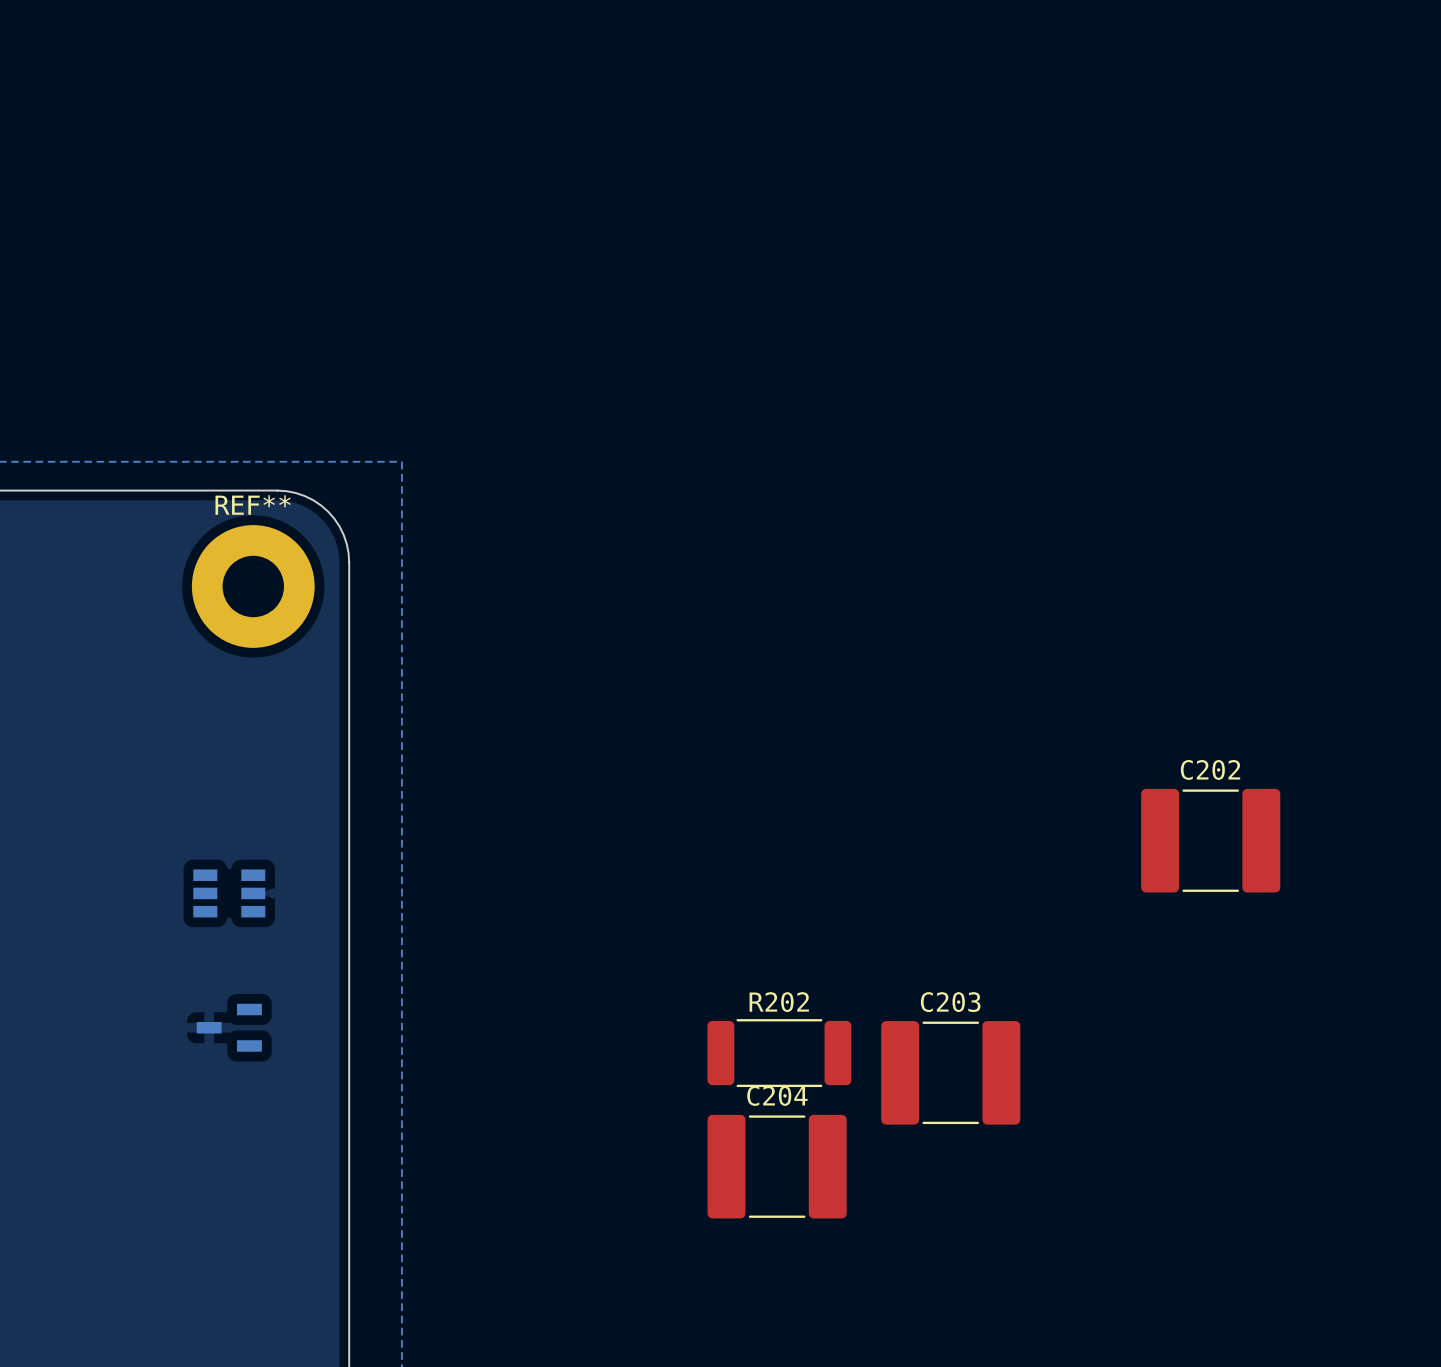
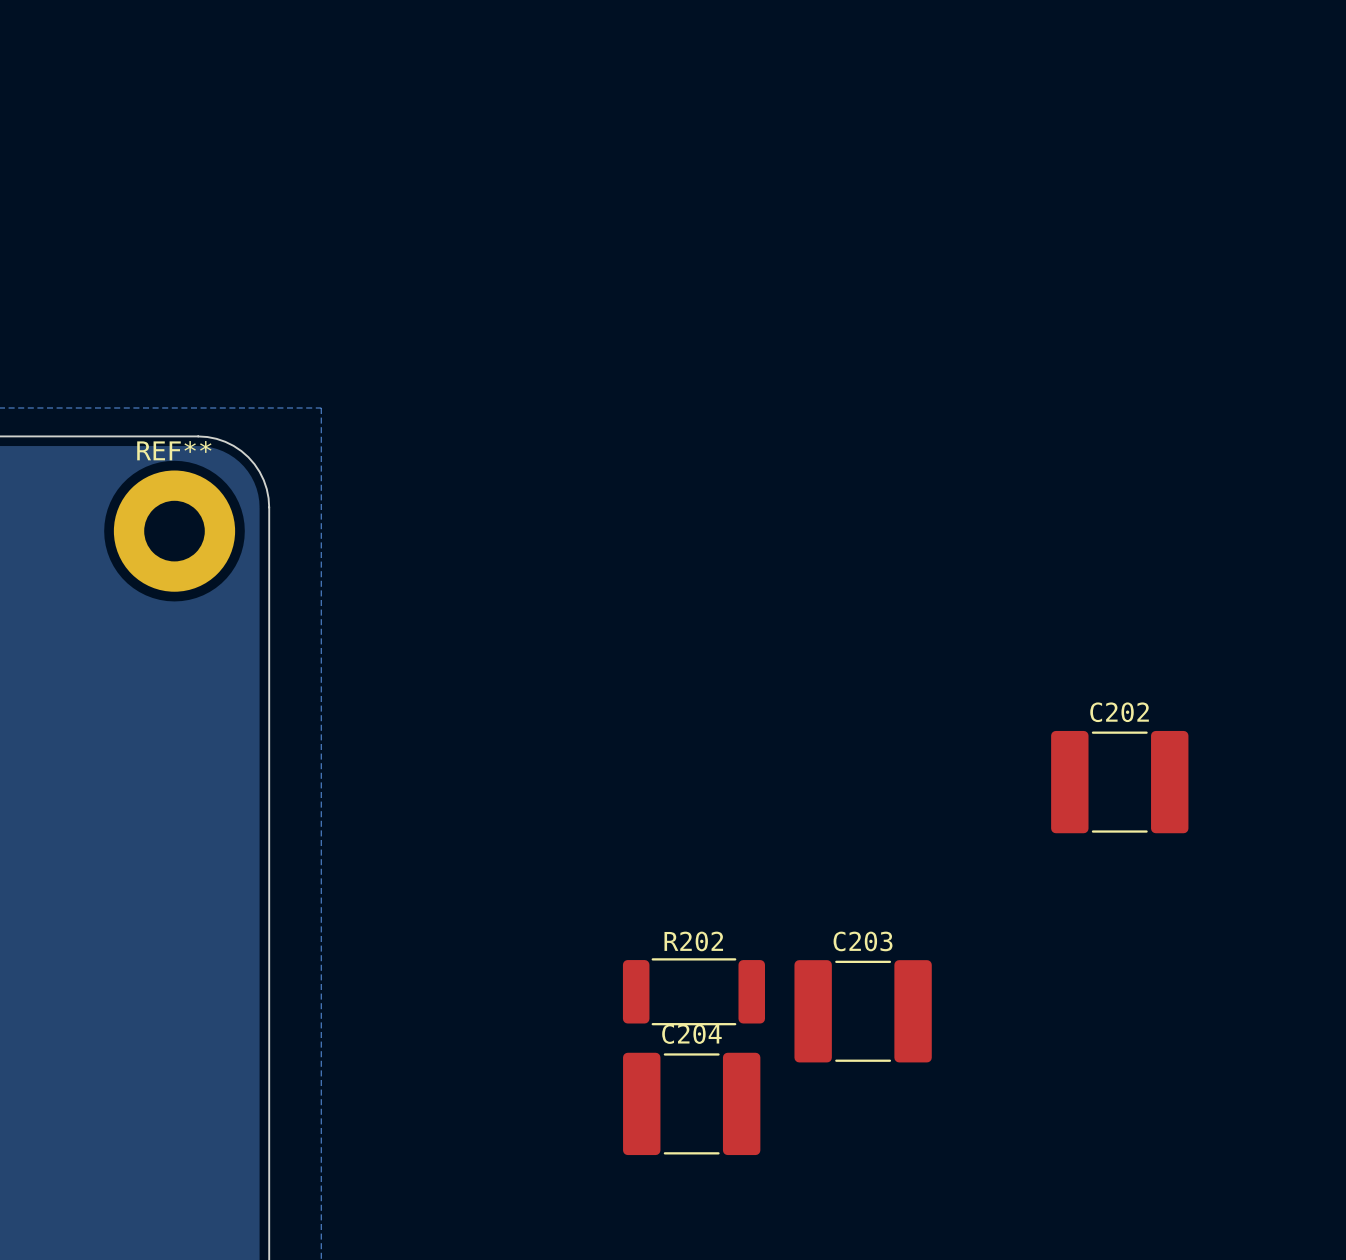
part: (229, 893) -> none
part: (229, 1027) -> none

